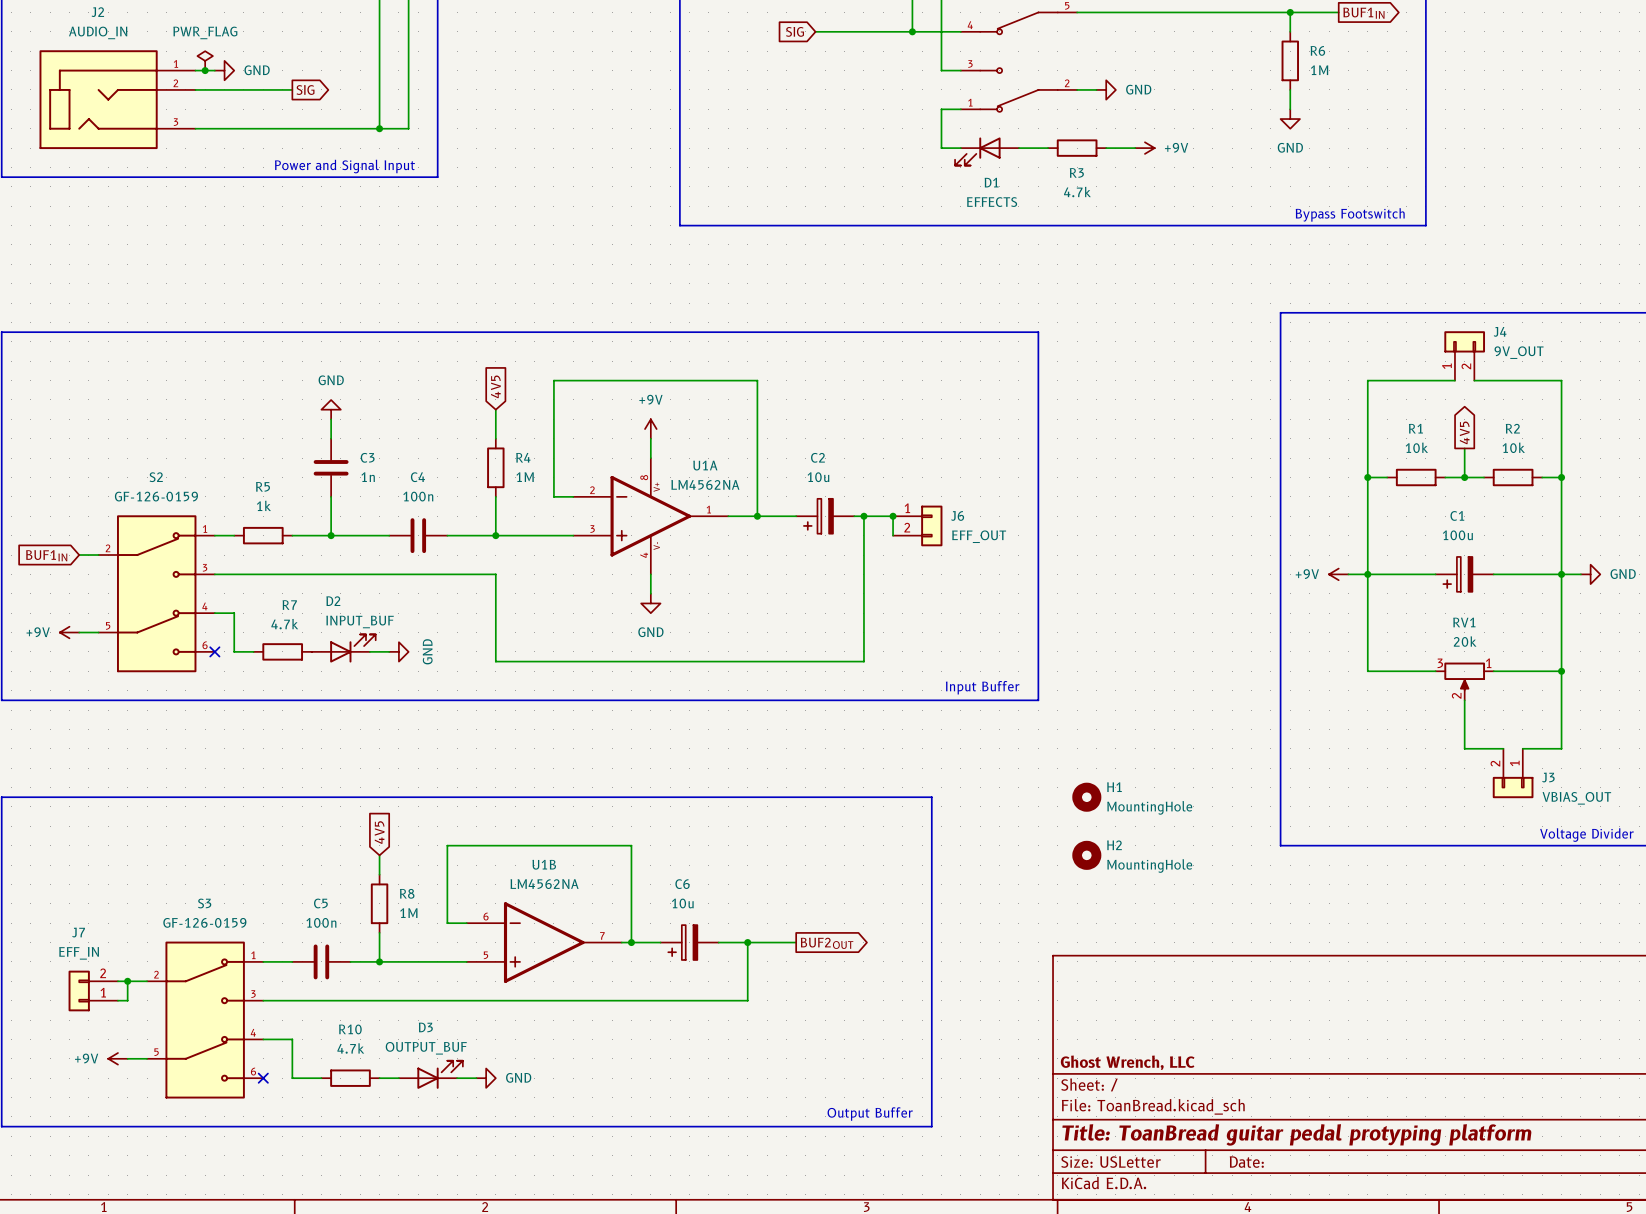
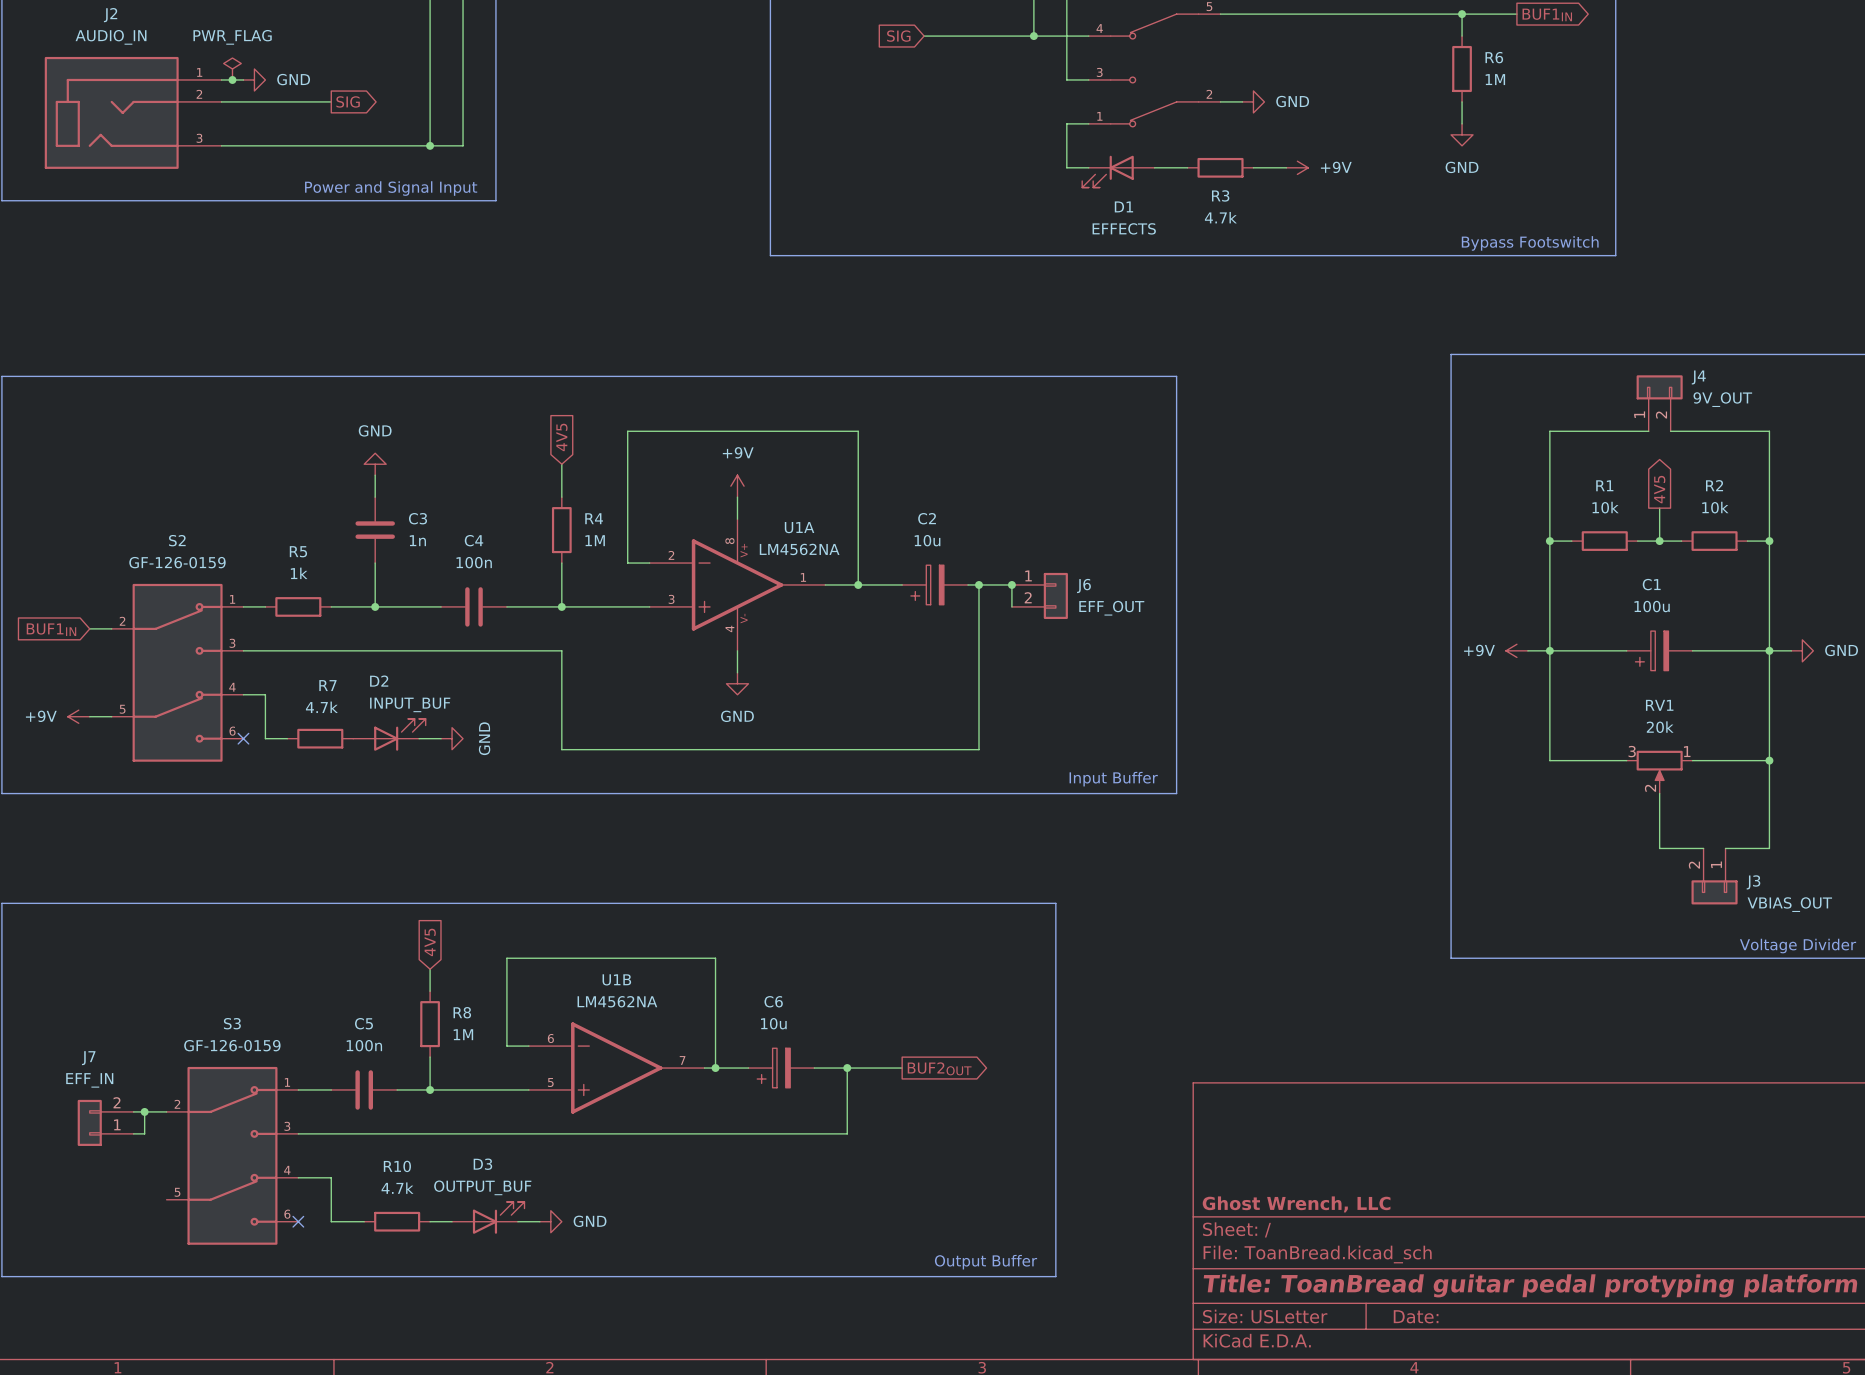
H1: MountingHole (1086, 797) -> none
H2: MountingHole (1086, 855) -> none
power symbol: +9V (117, 1058) -> none
wire: (127, 1058) (147, 1058) -> none

